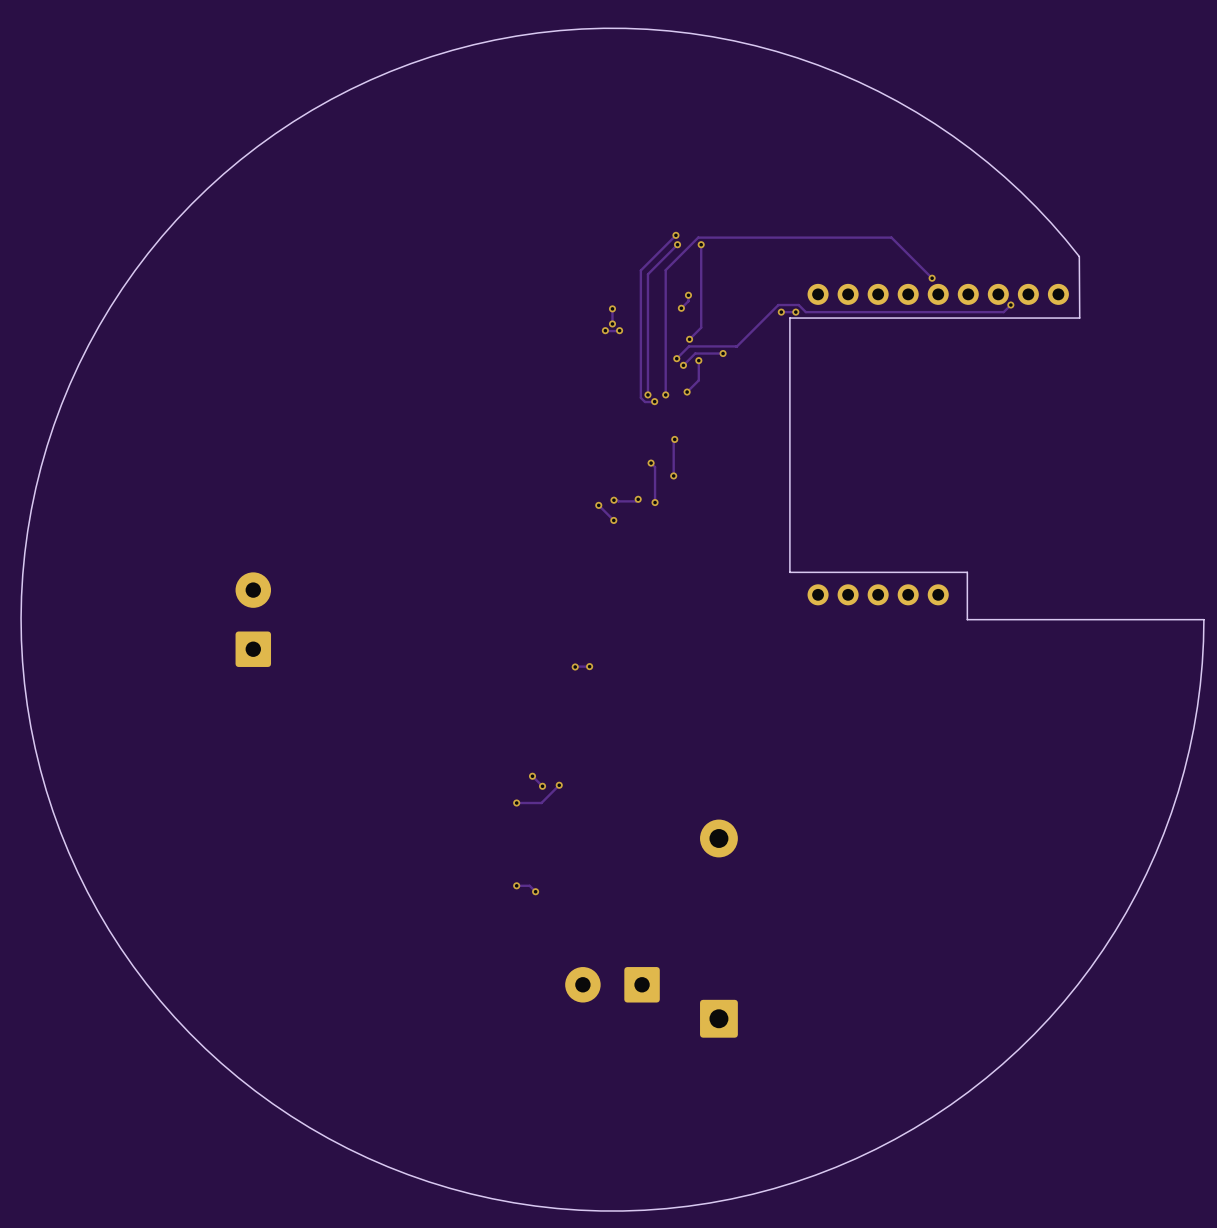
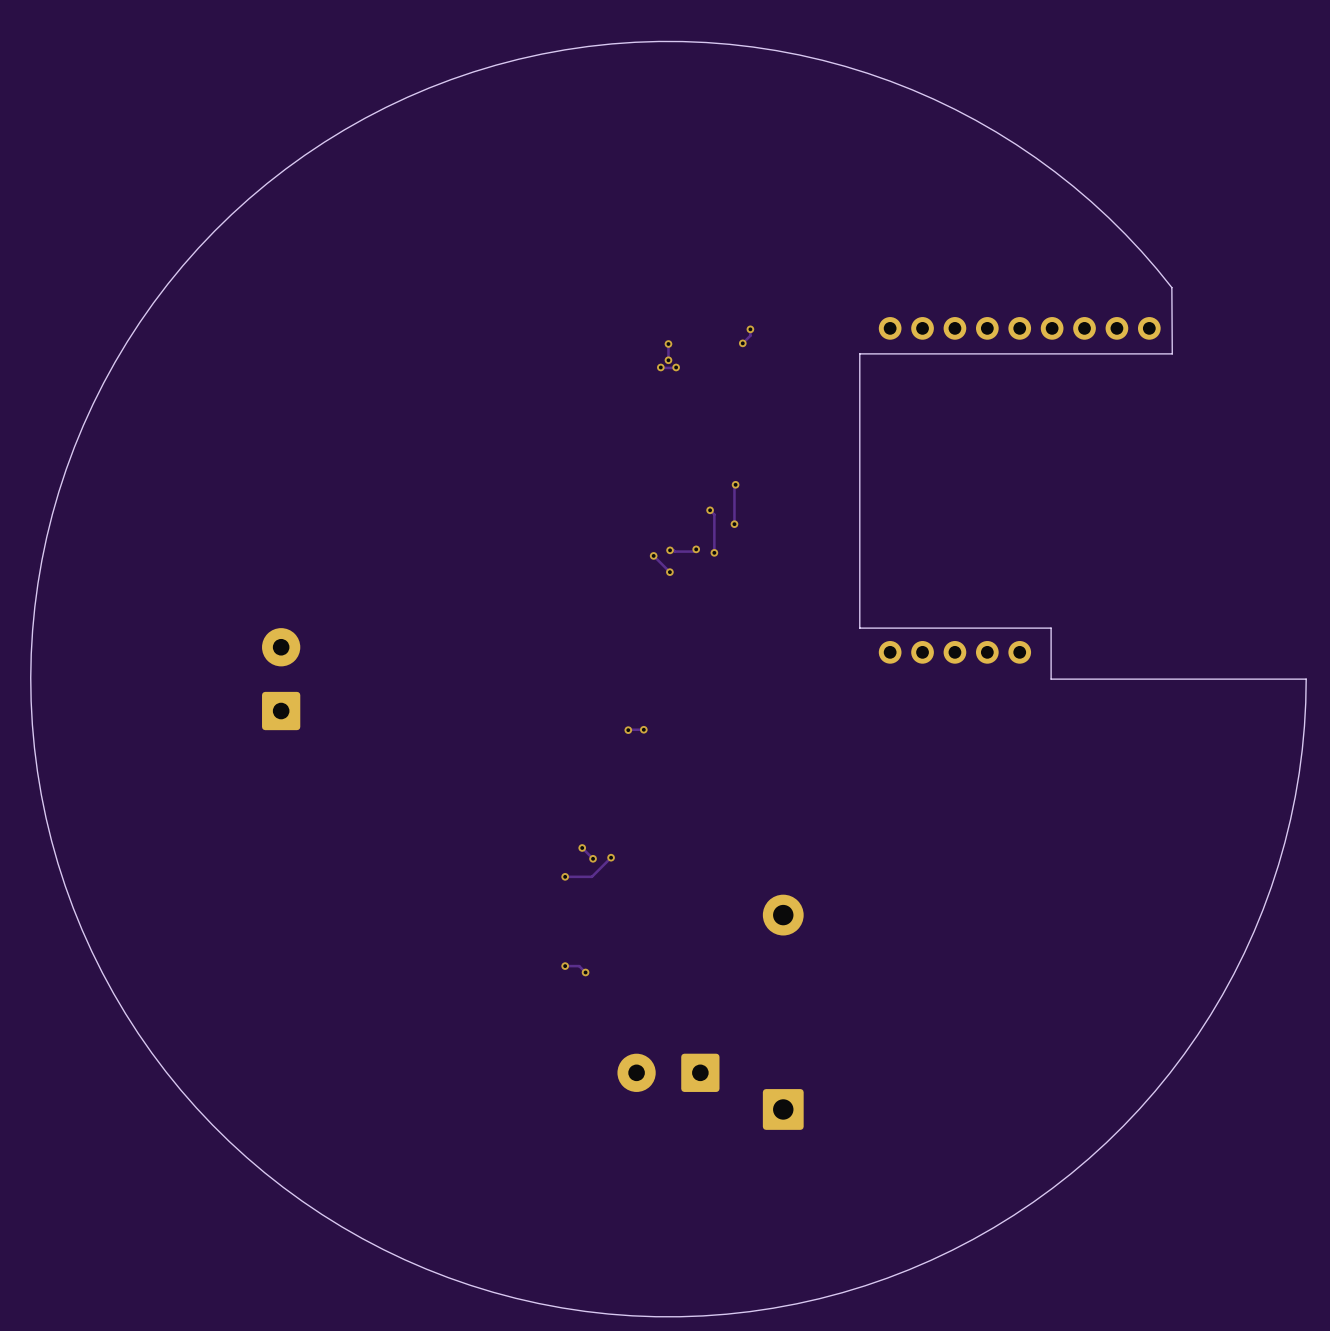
track: (675, 235) (640, 270) (640, 397) (645, 402) (654, 401) -> none
via: (675, 235) -> none
track: (677, 244) (647, 274) (647, 394) -> none
via: (677, 244) -> none
track: (701, 244) (701, 327) (689, 339) -> none
via: (701, 244) -> none
track: (932, 278) (891, 237) (698, 237) (665, 270) (665, 394) -> none
via: (932, 278) -> none
track: (1010, 305) (1003, 312) (805, 312) (798, 305) (778, 305) (736, 346) (689, 346) (676, 358) -> none
via: (1010, 305) -> none
via: (781, 312) -> none
track: (795, 312) (781, 312) -> none
via: (795, 312) -> none
via: (689, 339) -> none
track: (723, 353) (695, 353) (683, 365) -> none
via: (723, 353) -> none
via: (676, 358) -> none
track: (698, 360) (698, 380) (687, 392) -> none
via: (698, 360) -> none
via: (683, 365) -> none
via: (687, 392) -> none
via: (647, 394) -> none
via: (665, 394) -> none
via: (654, 401) -> none

